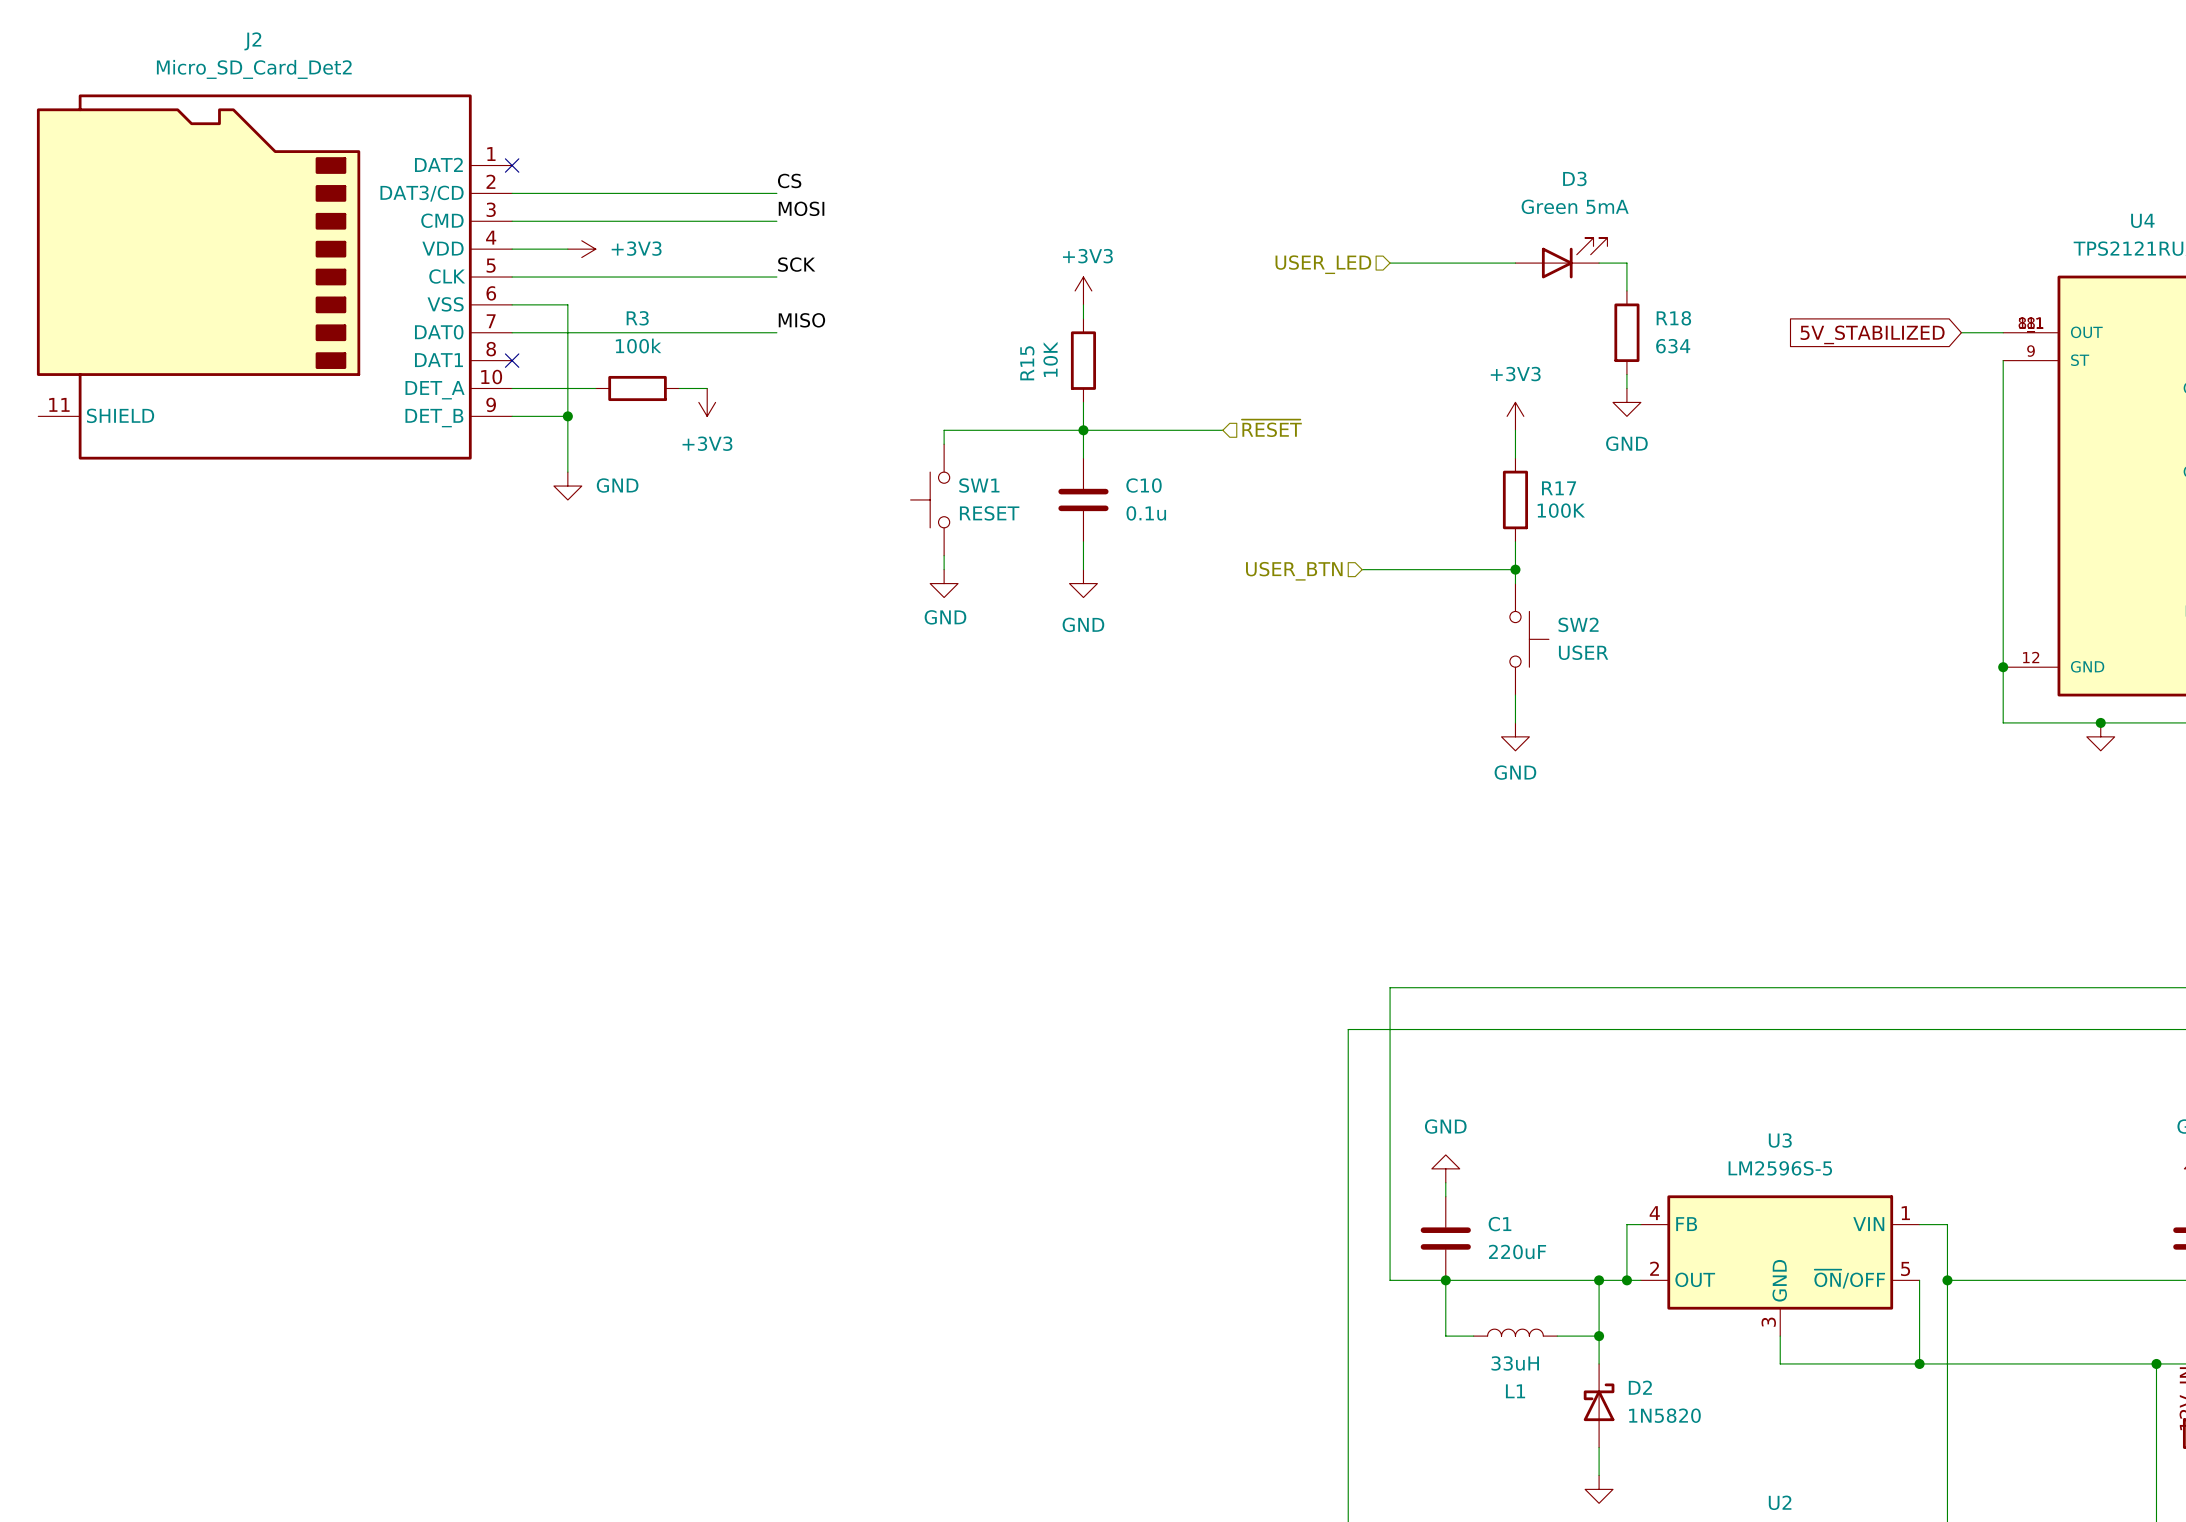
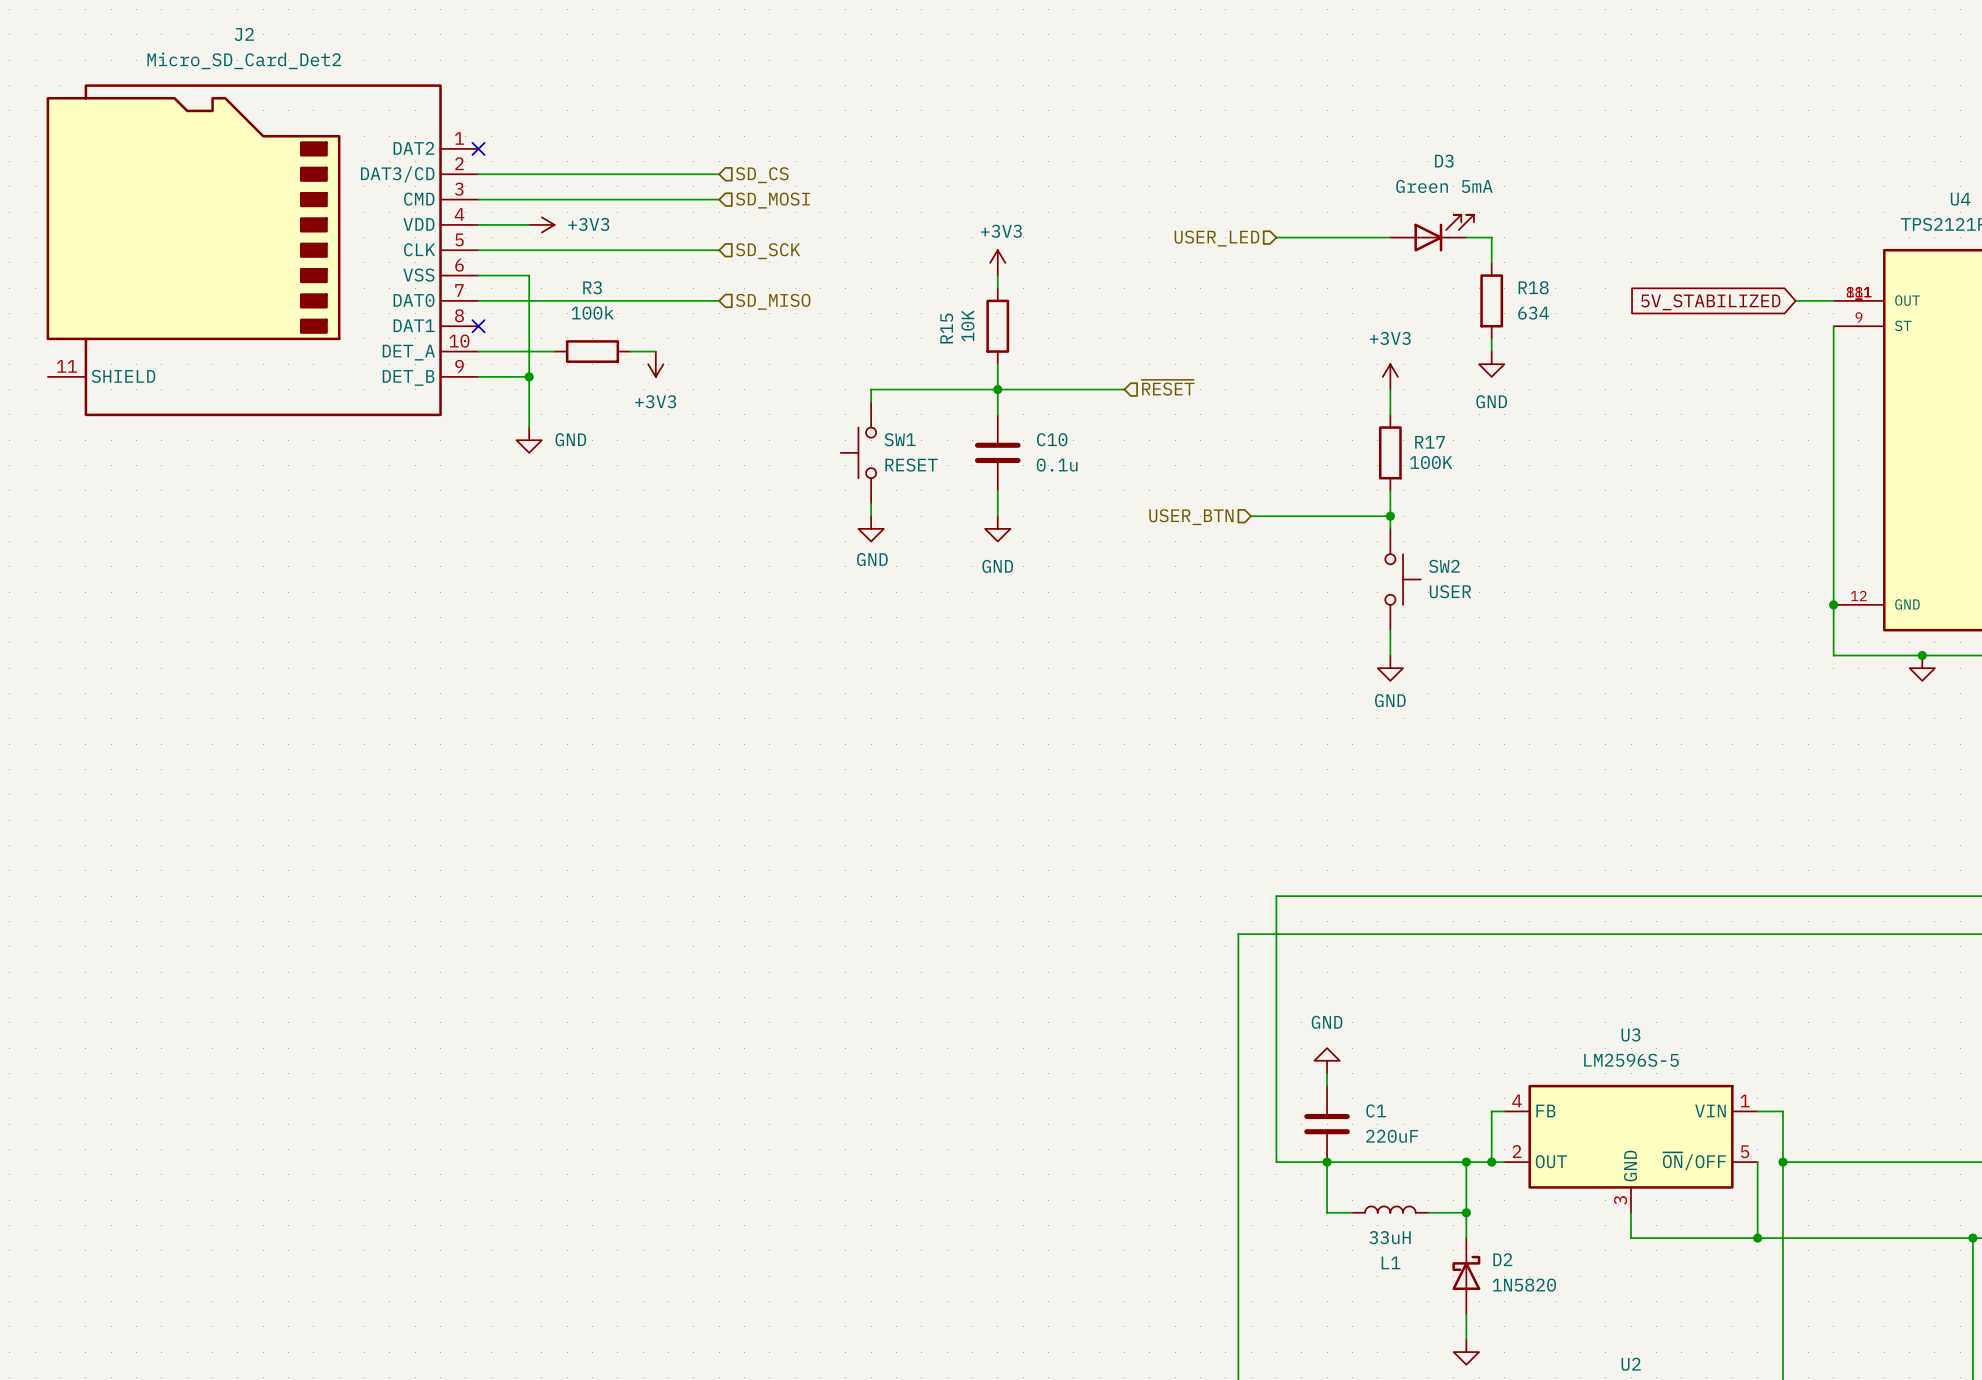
label: CS (789, 180) -> none
hierarchical label: none -> SD_CS (762, 175)
label: MOSI (801, 208) -> none
hierarchical label: none -> SD_MOSI (772, 200)
label: SCK (796, 264) -> none
hierarchical label: none -> SD_SCK (768, 251)
label: MISO (801, 320) -> none
hierarchical label: none -> SD_MISO (773, 301)

